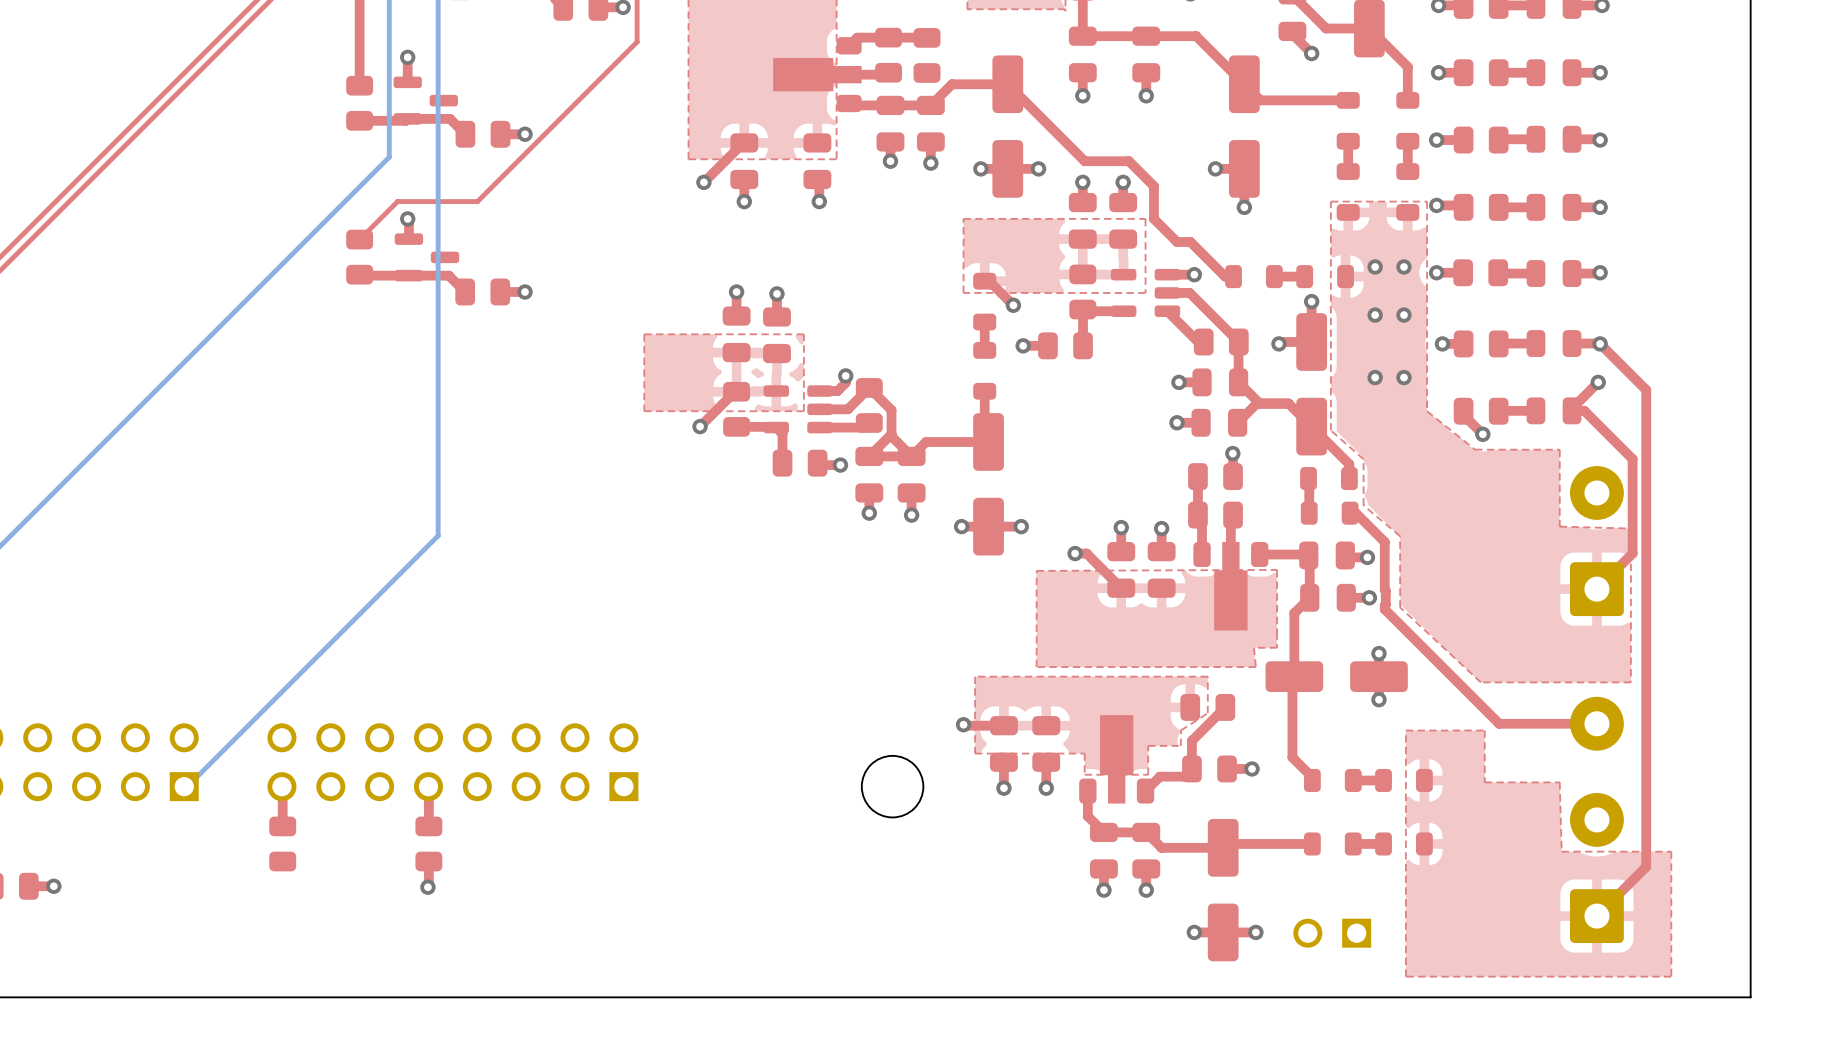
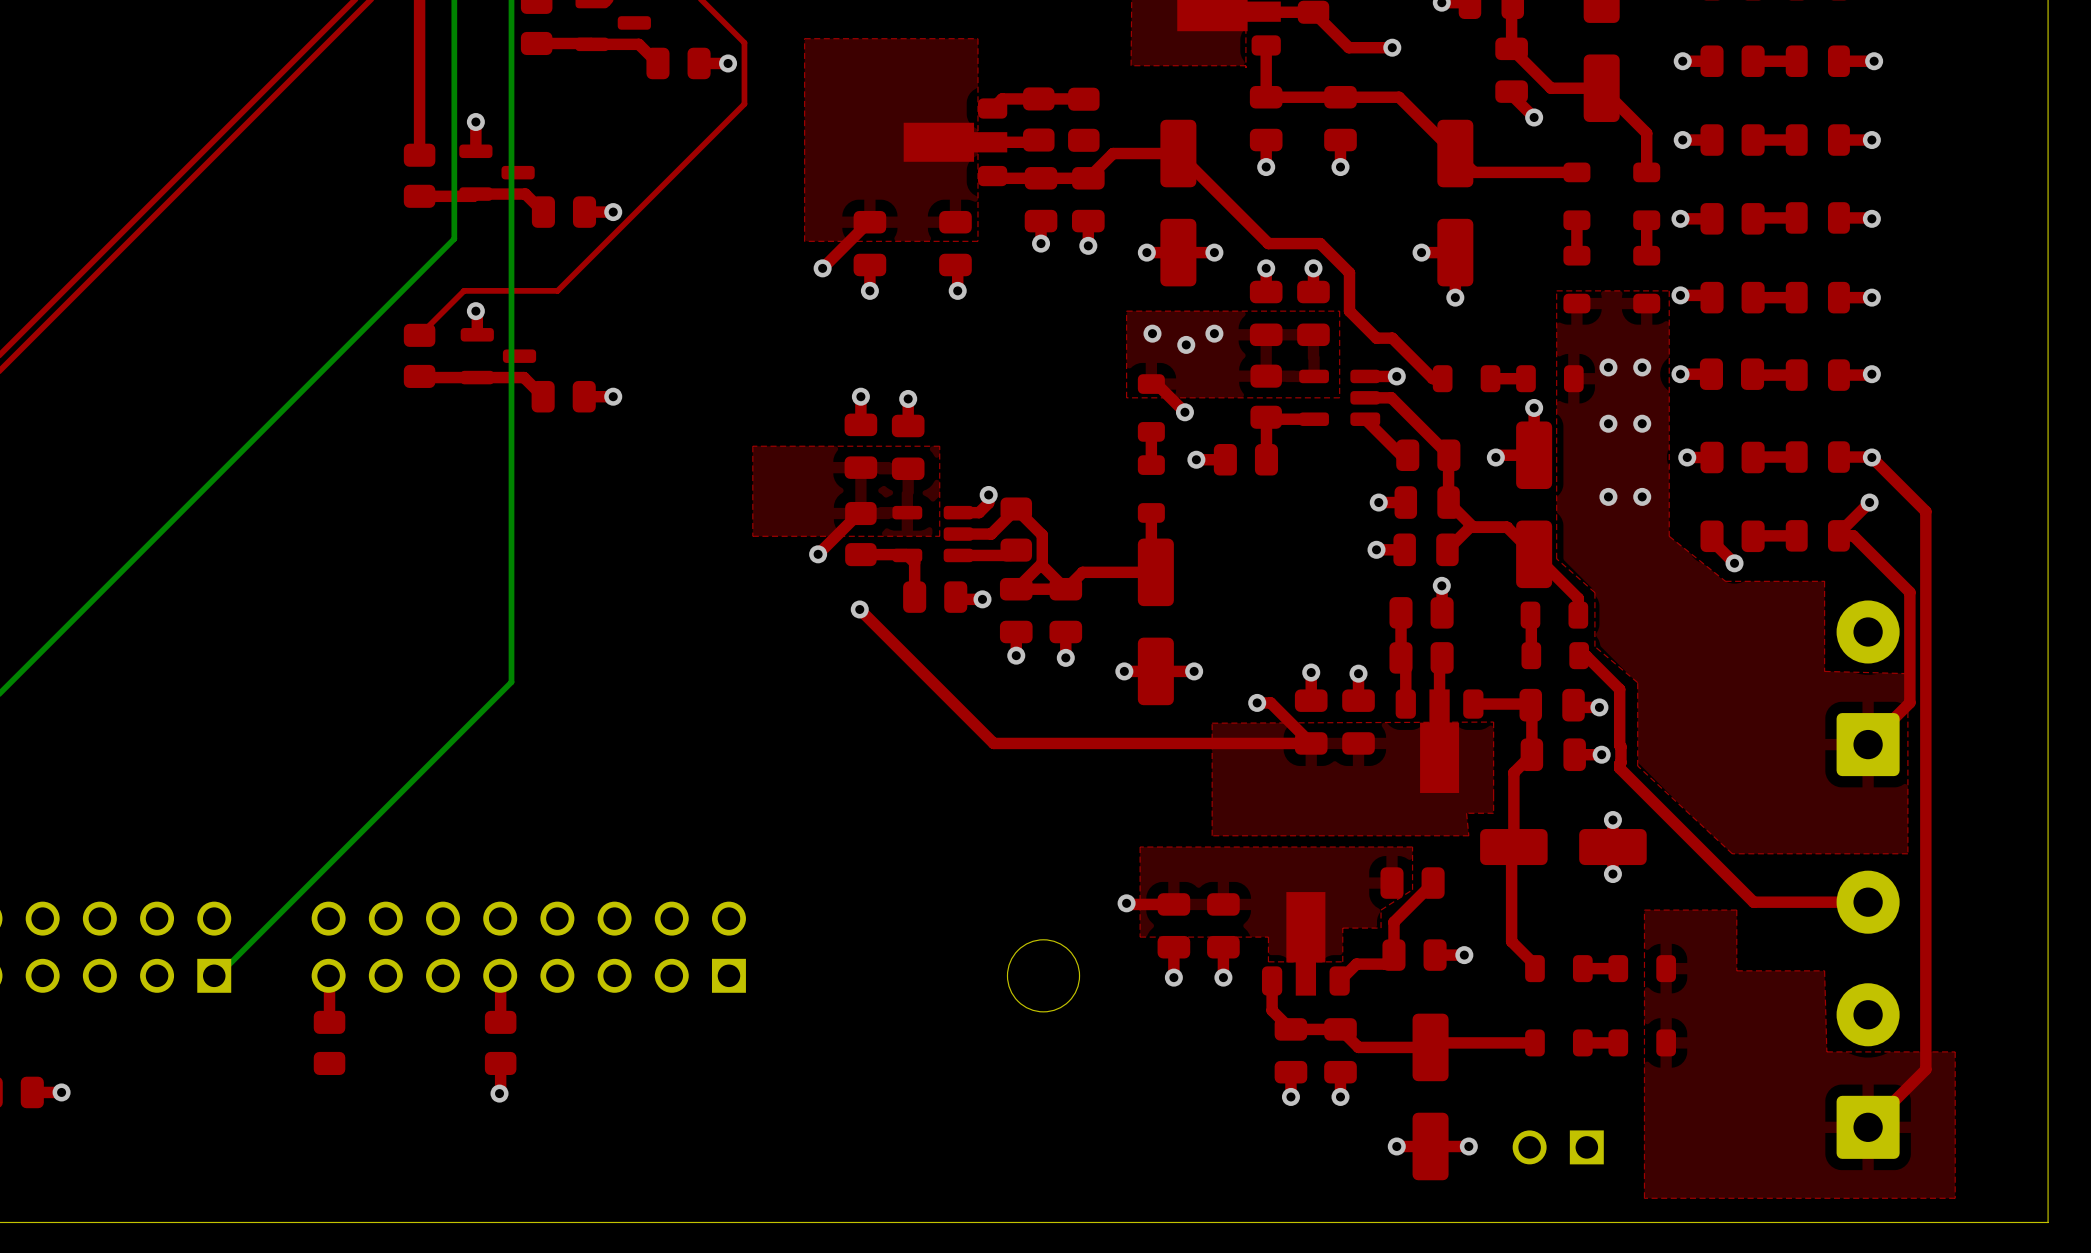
via: none -> (1152, 333)
via: none -> (1214, 333)
via: none -> (1186, 344)
top track: none -> (859, 609) (993, 743) (1311, 743)
via: none -> (859, 609)

